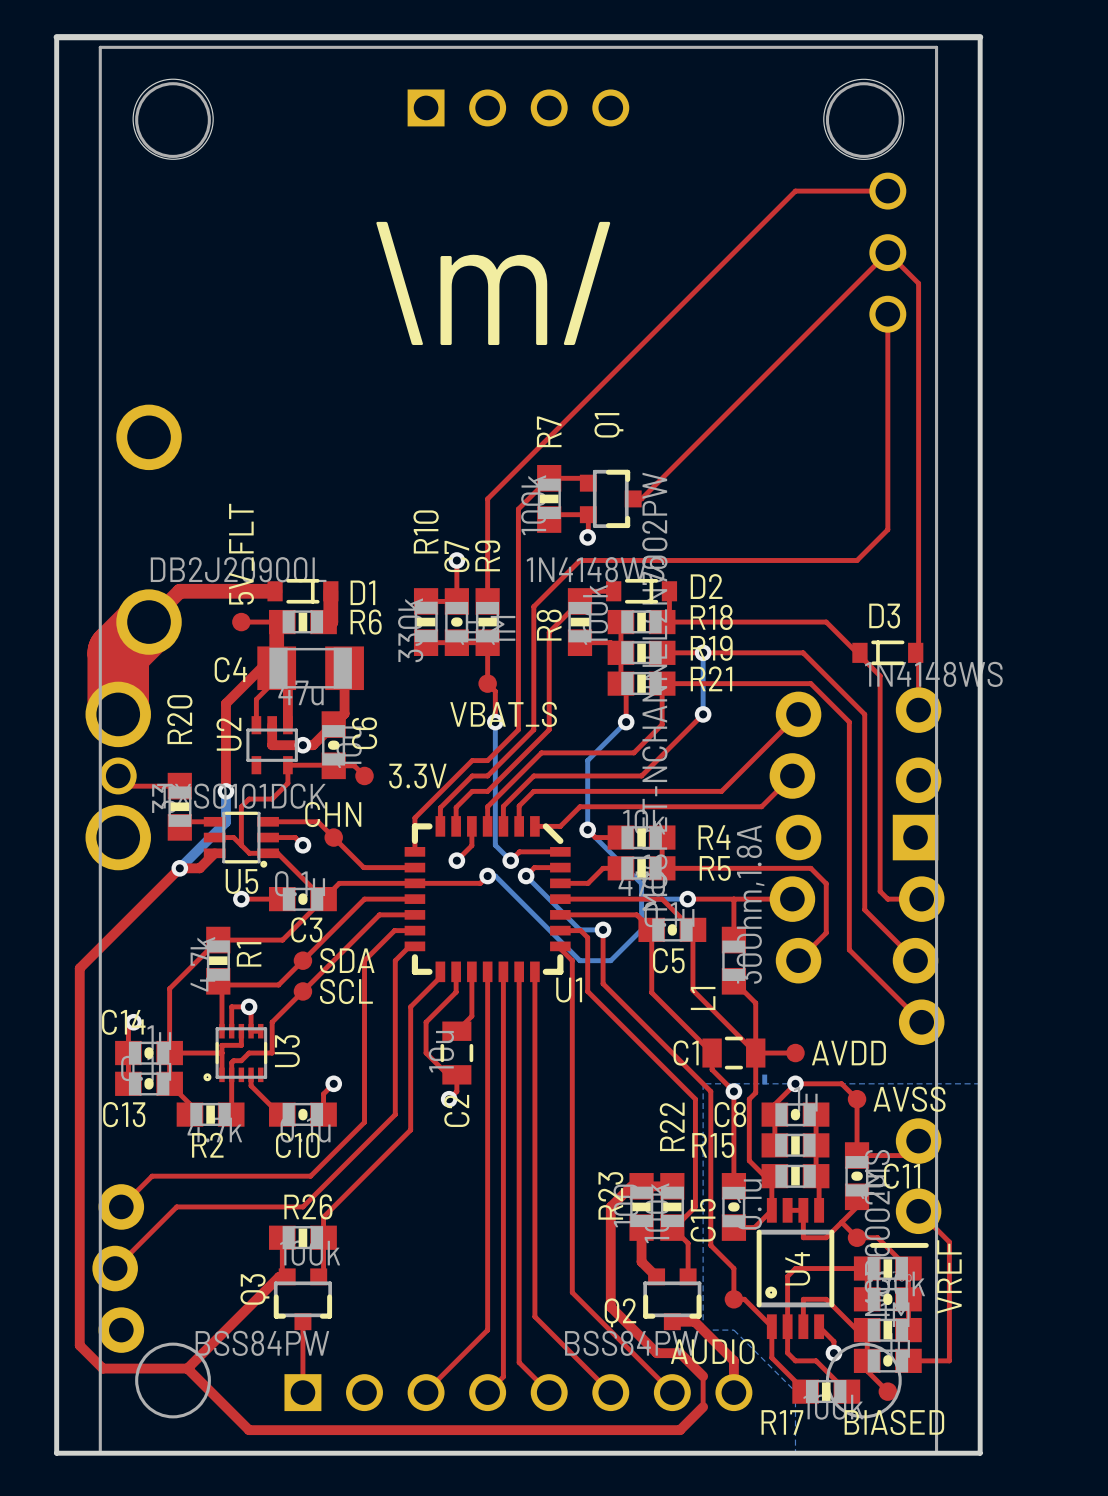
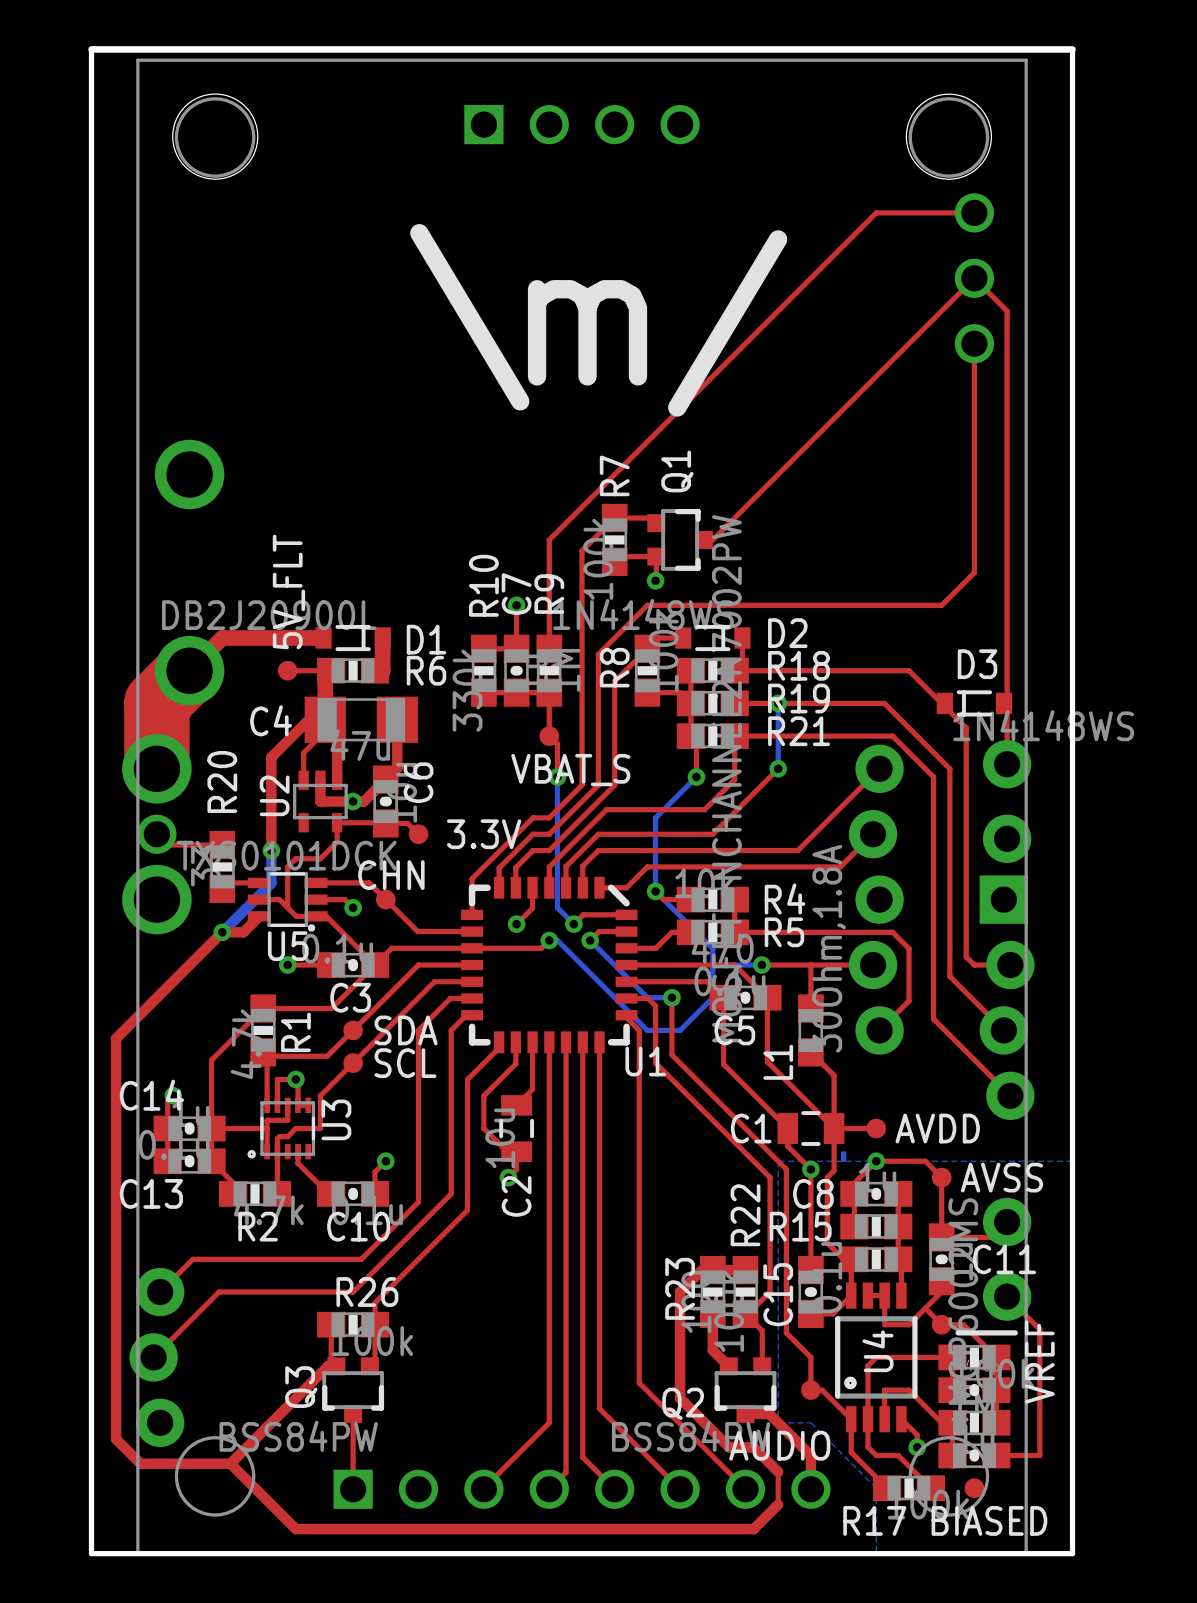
top track: (867, 1371) (887, 1391) -> none

